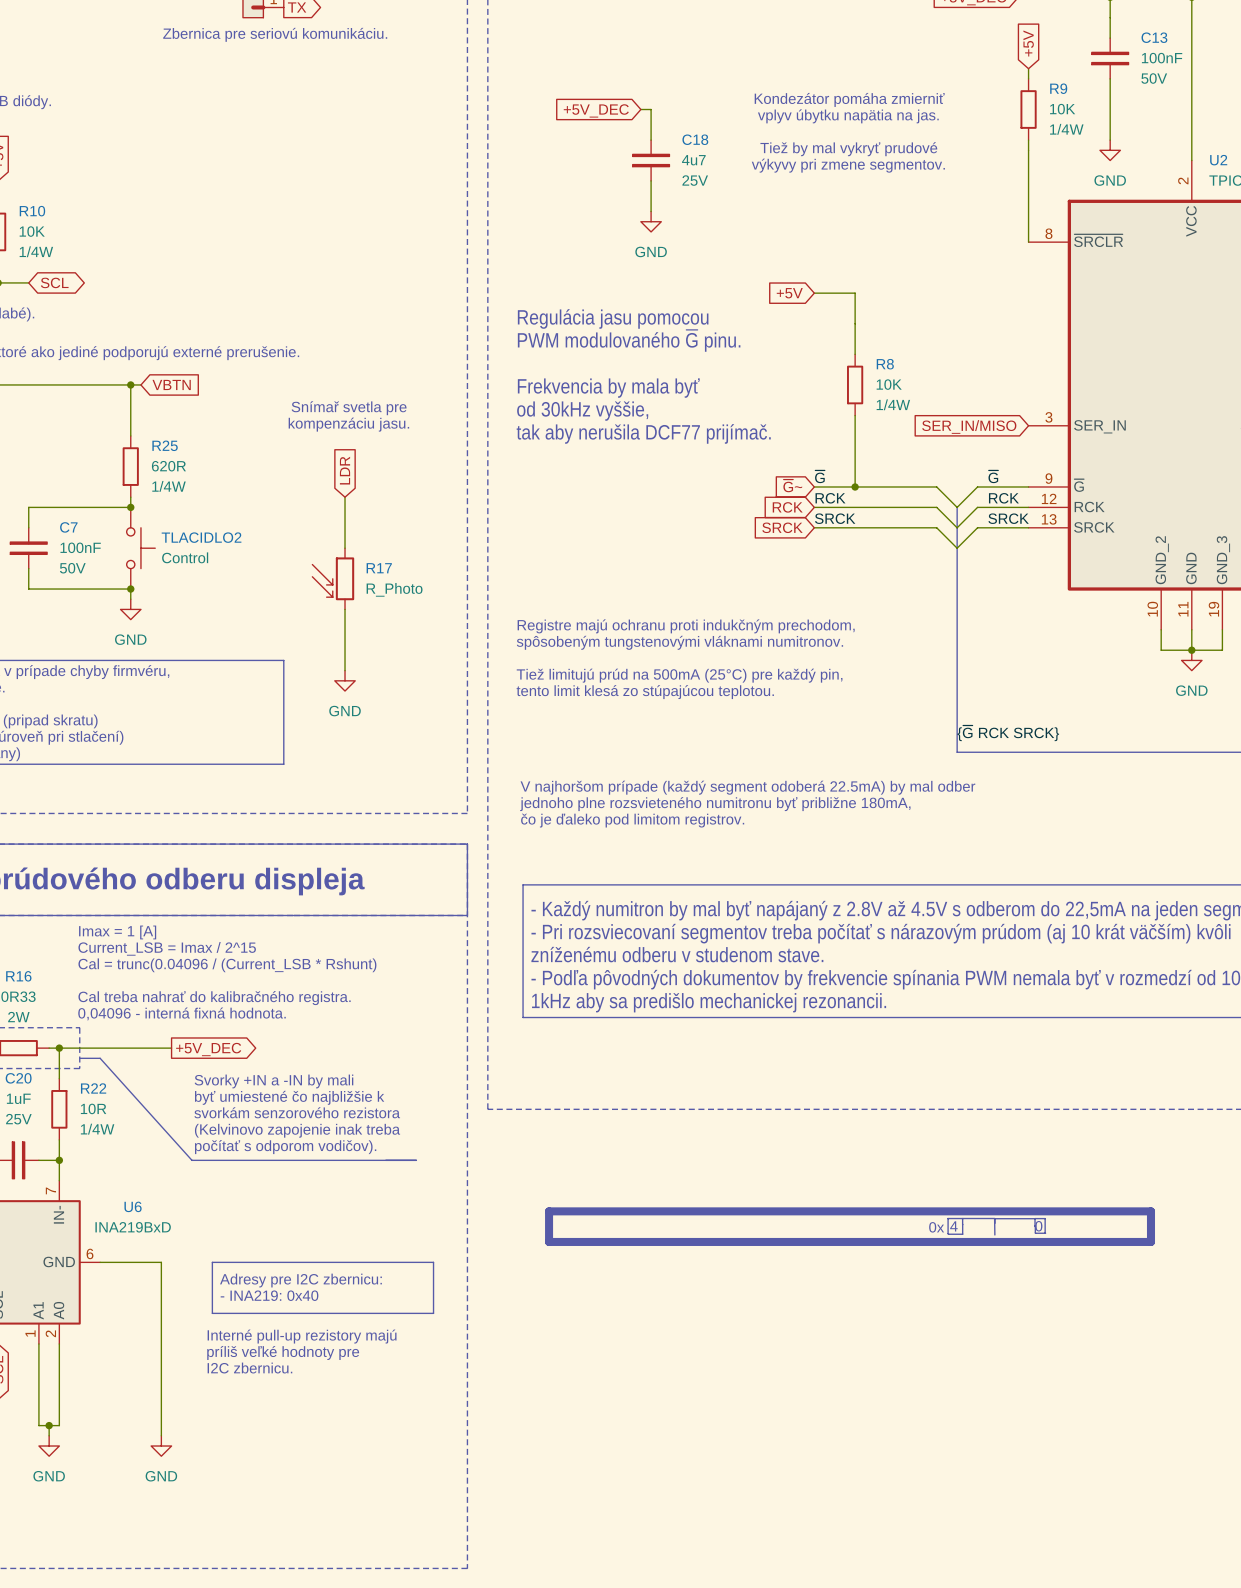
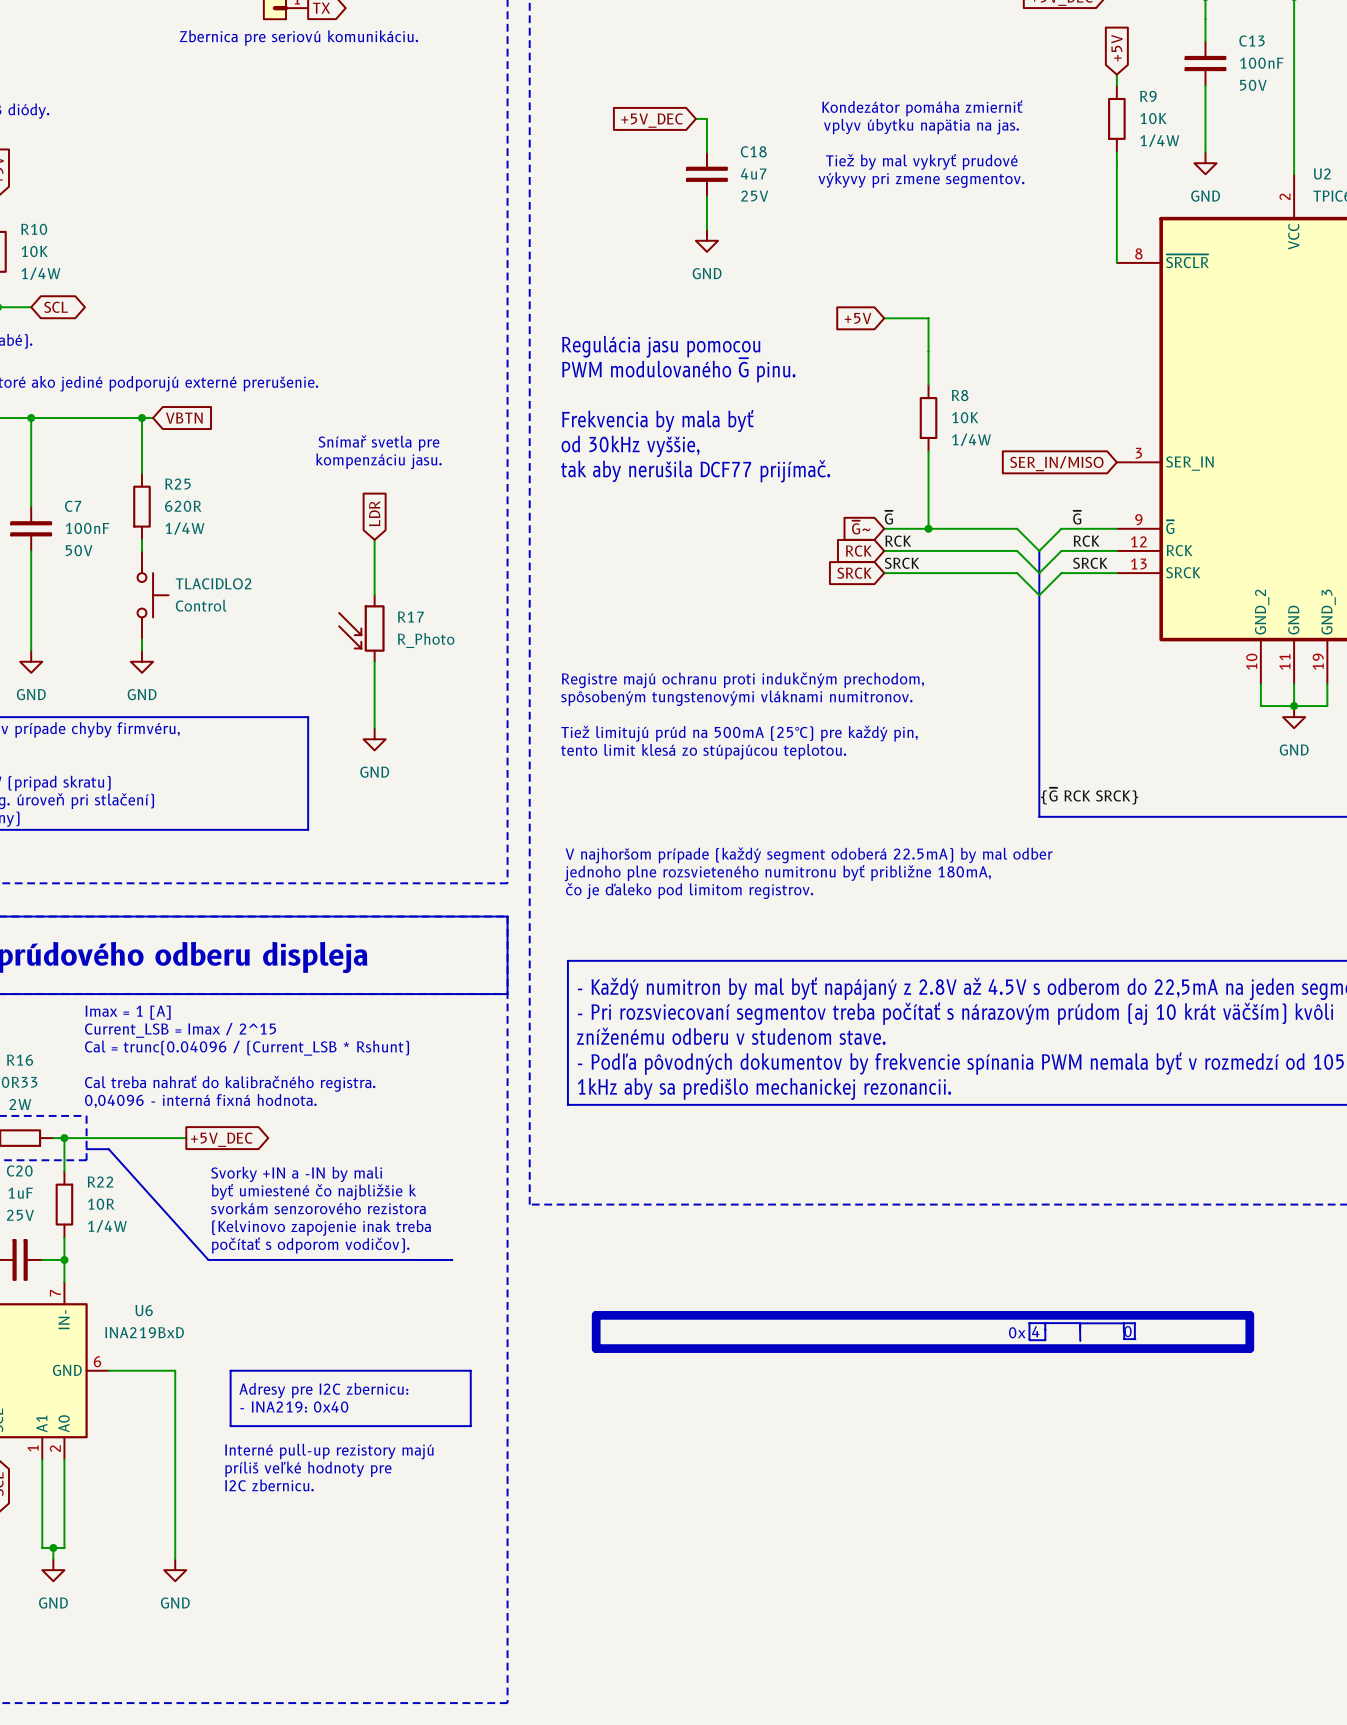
wire: none -> (31, 418) (31, 506)
junction: none -> (31, 418)
wire: (28, 507) (130, 507) -> none
junction: (130, 507) -> none
C7 position: (28, 548) -> (31, 528)
wire: (28, 589) (130, 589) -> (31, 639) (31, 650)
junction: (130, 589) -> none
power symbol: none -> GND (31, 661)

